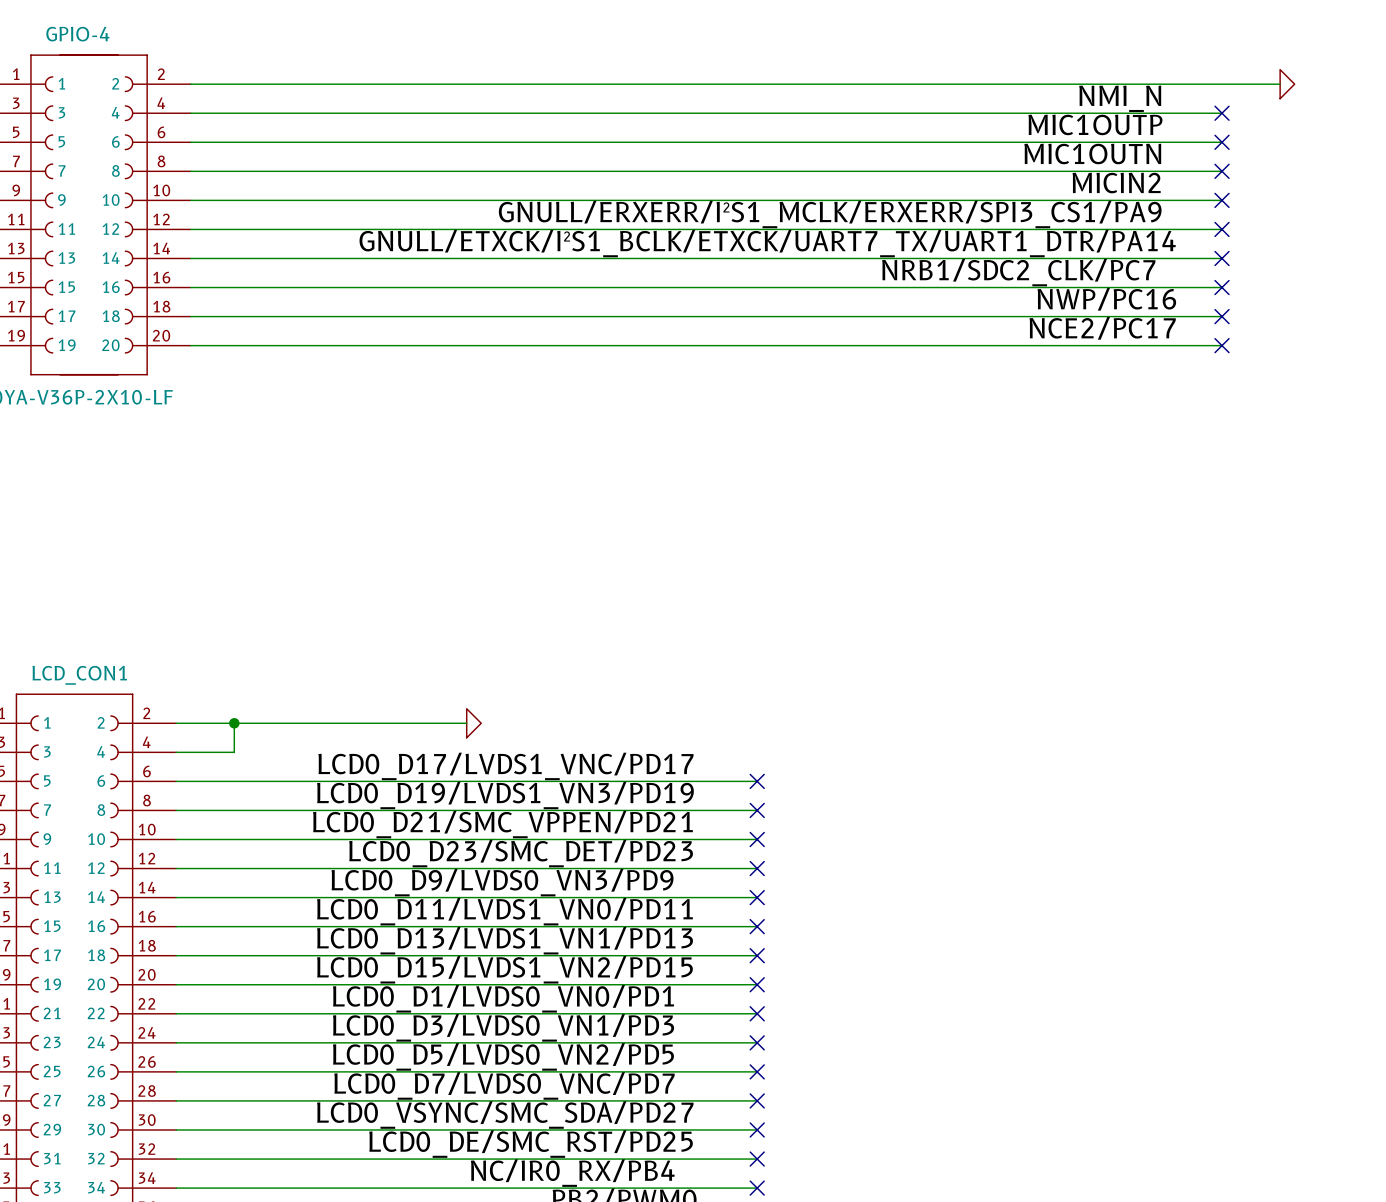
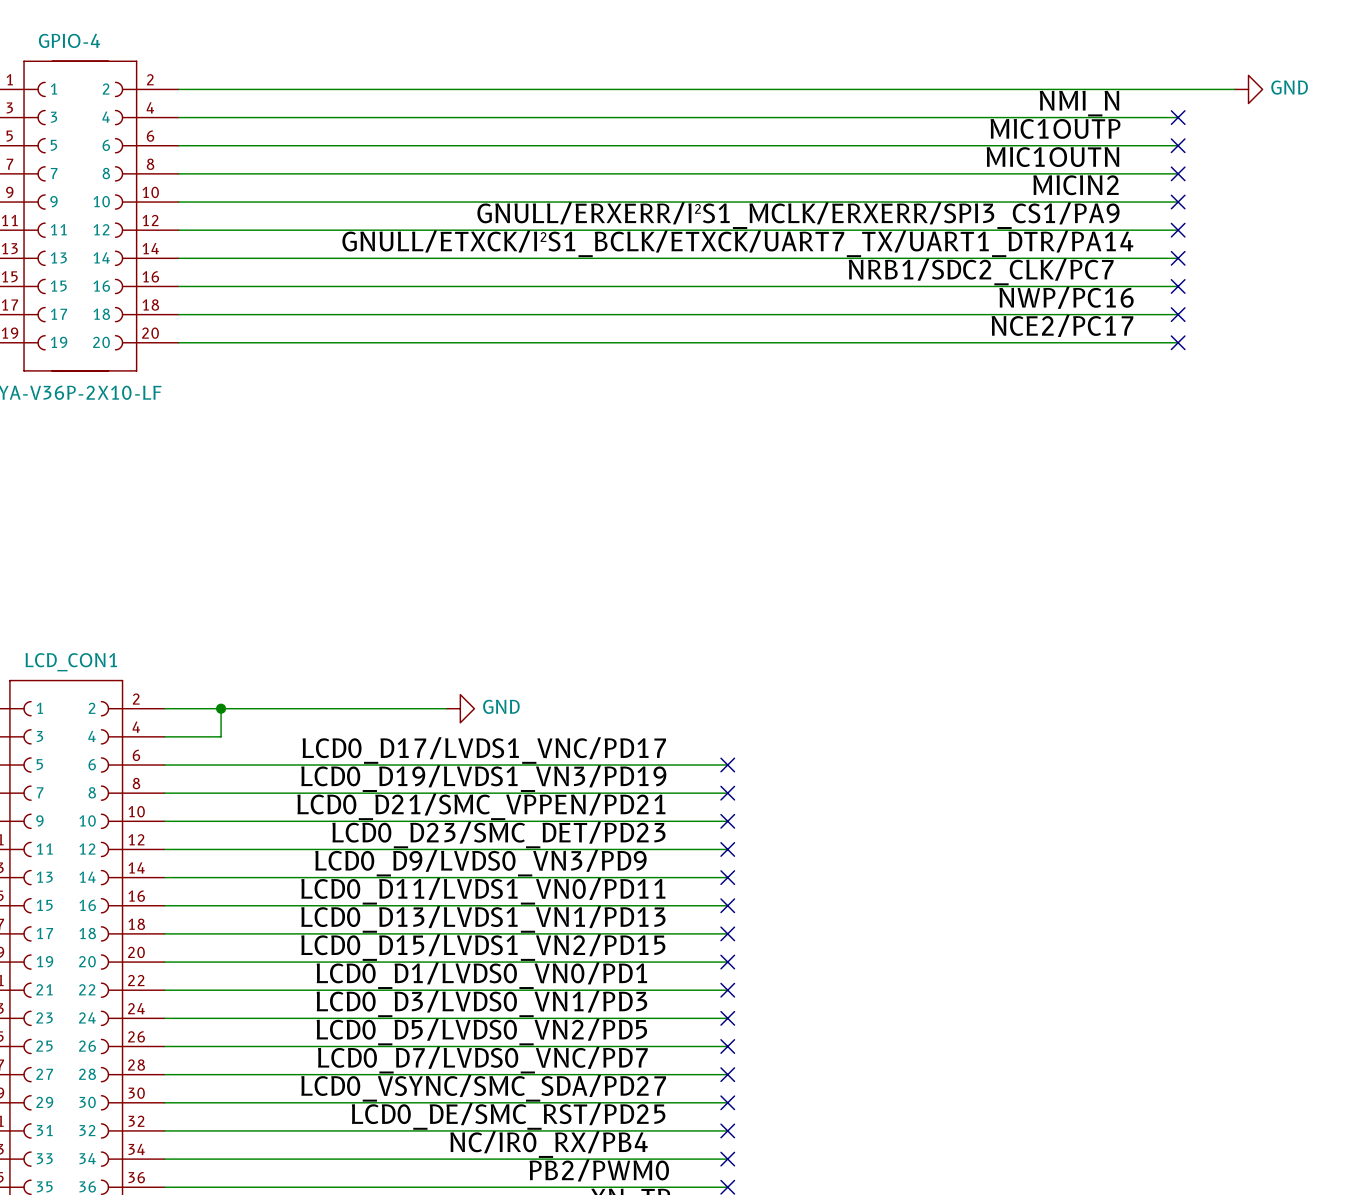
power symbol shape: [1280, 69, 1295, 99] -> [1234, 75, 1263, 104]
power symbol text: none -> GND (1289, 87)
power symbol shape: [466, 708, 482, 738] -> [446, 694, 475, 723]
power symbol text: none -> GND (501, 706)

